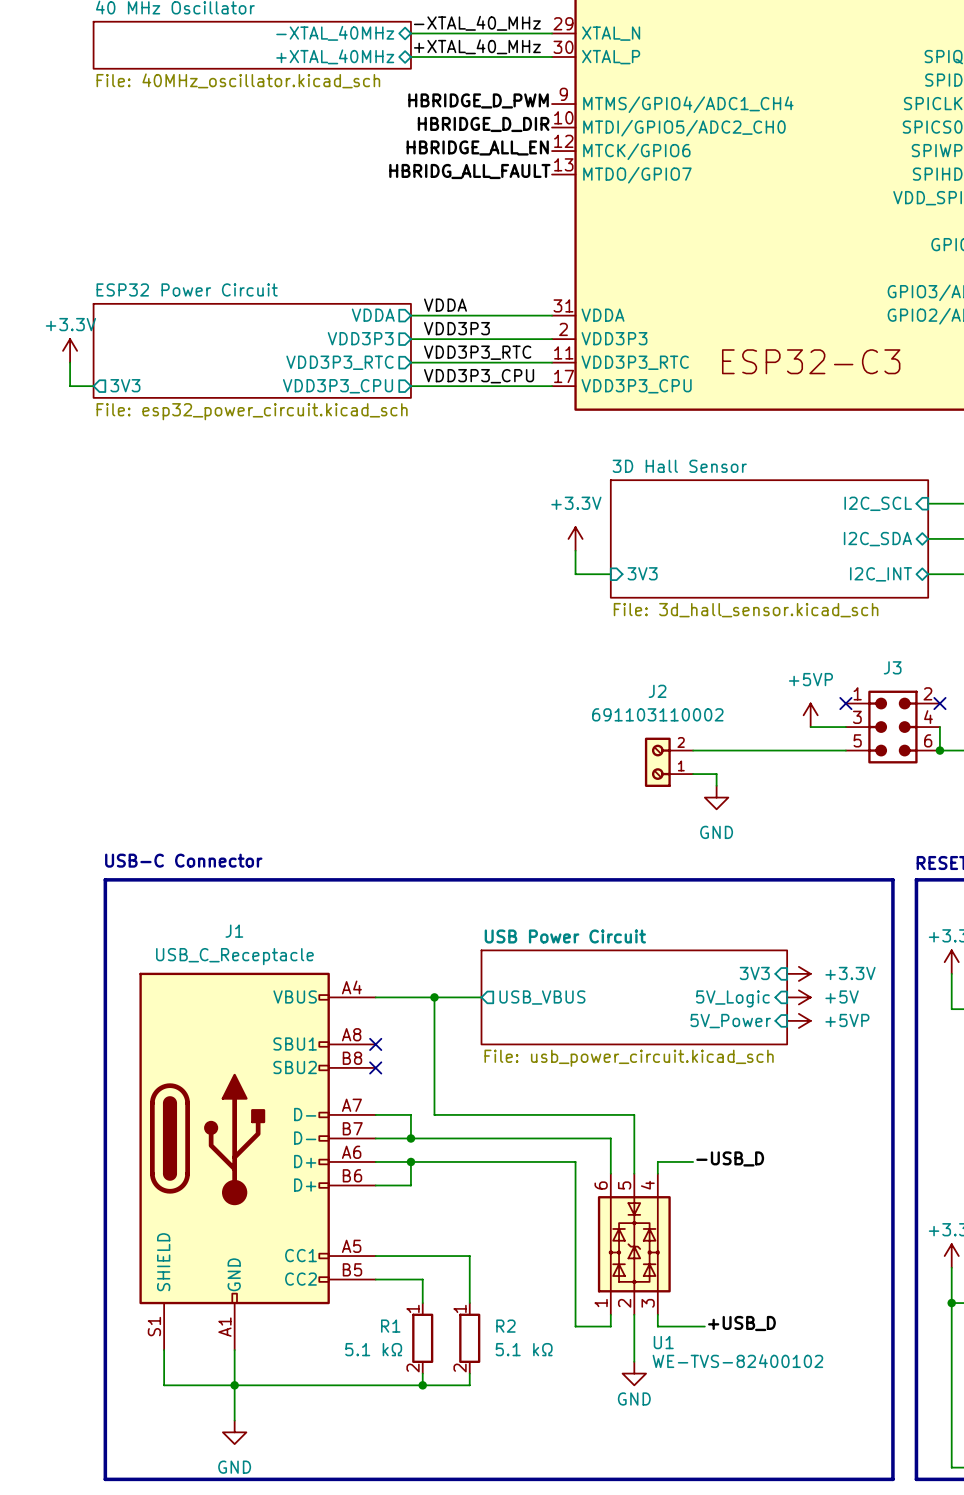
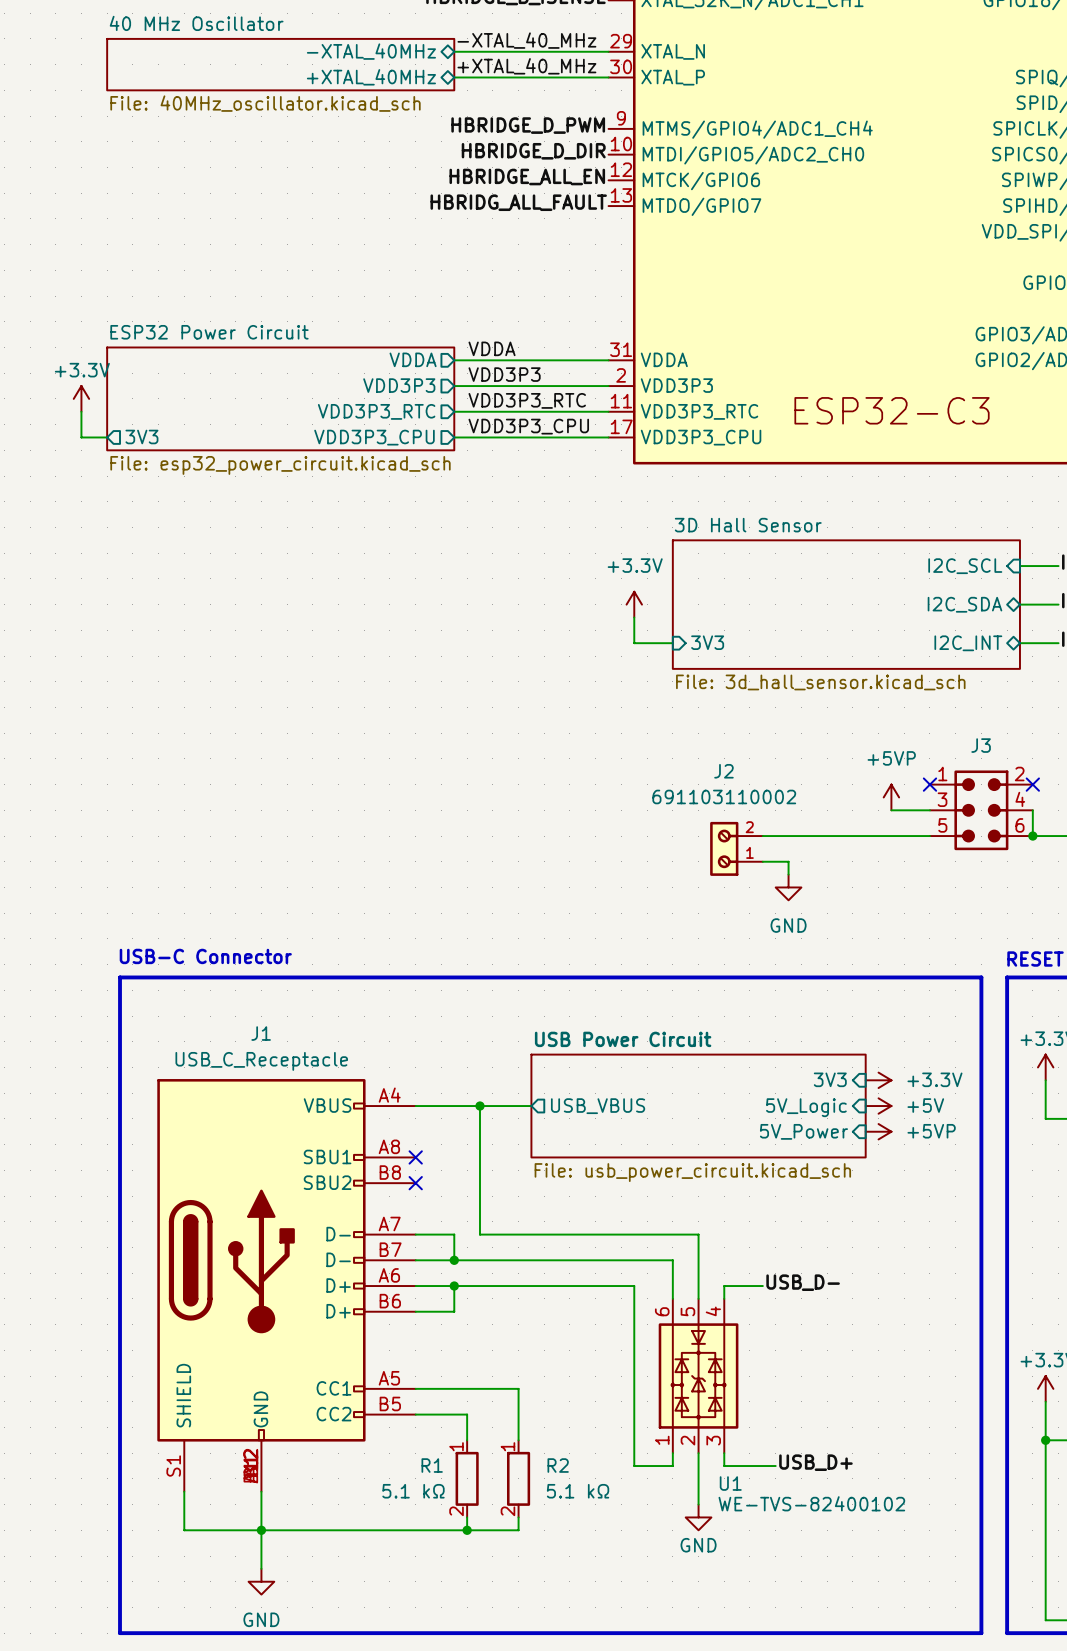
J1 symbol: [139, 972, 376, 1351] -> [157, 1079, 416, 1492]
label: -USB_D (730, 1158) -> USB_D- (803, 1282)
label: +USB_D (741, 1323) -> USB_D+ (815, 1462)

